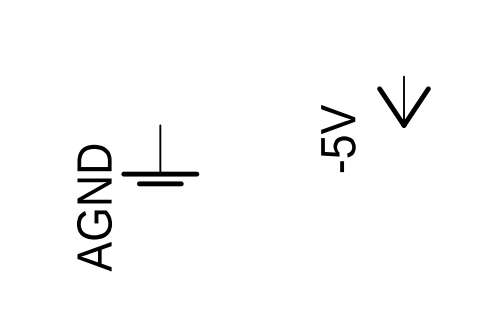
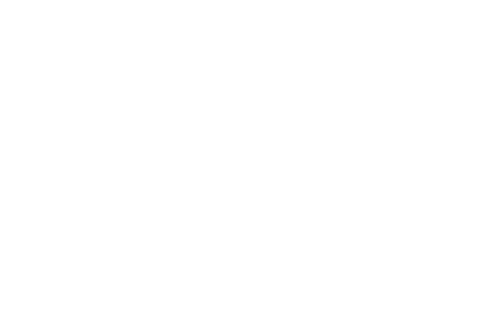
power symbol: -5V (404, 102) -> none
power symbol: AGND (160, 155) -> none

